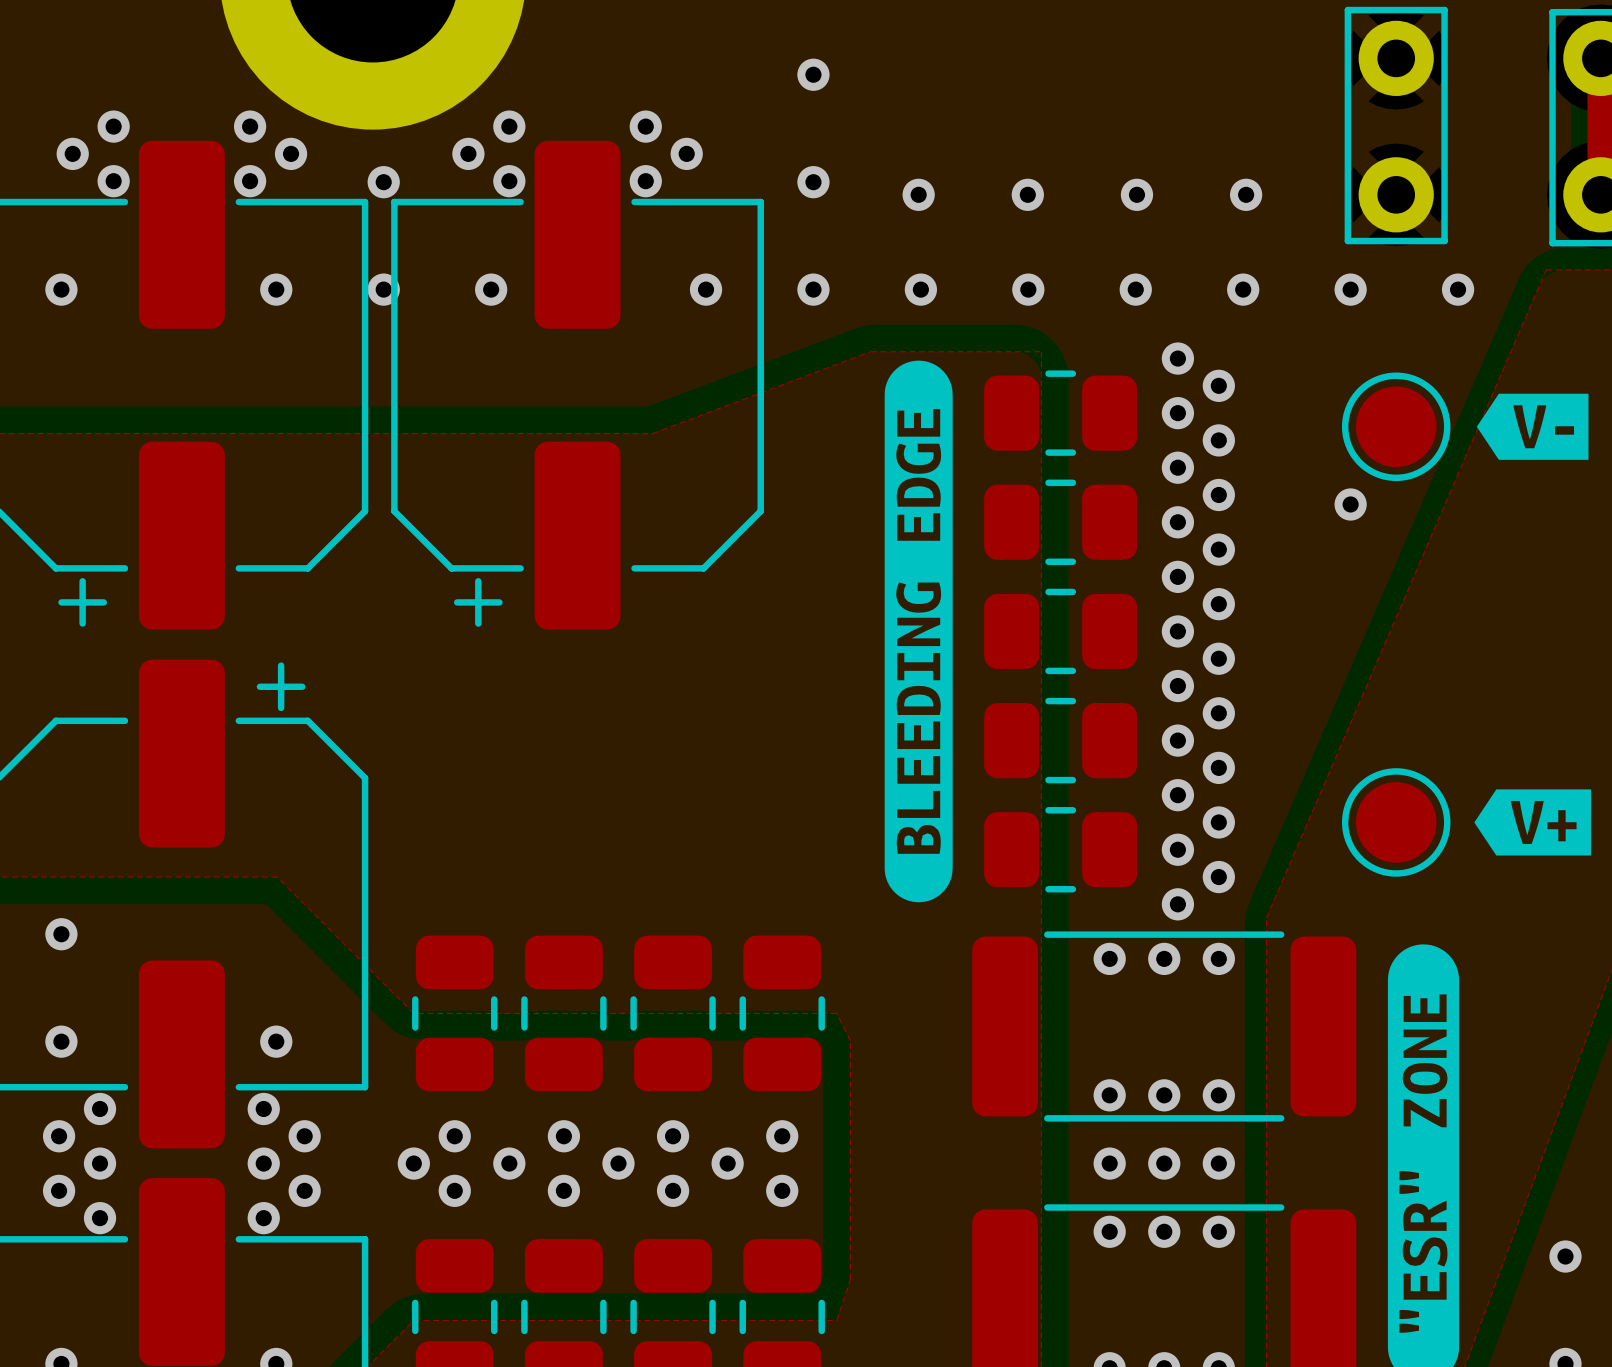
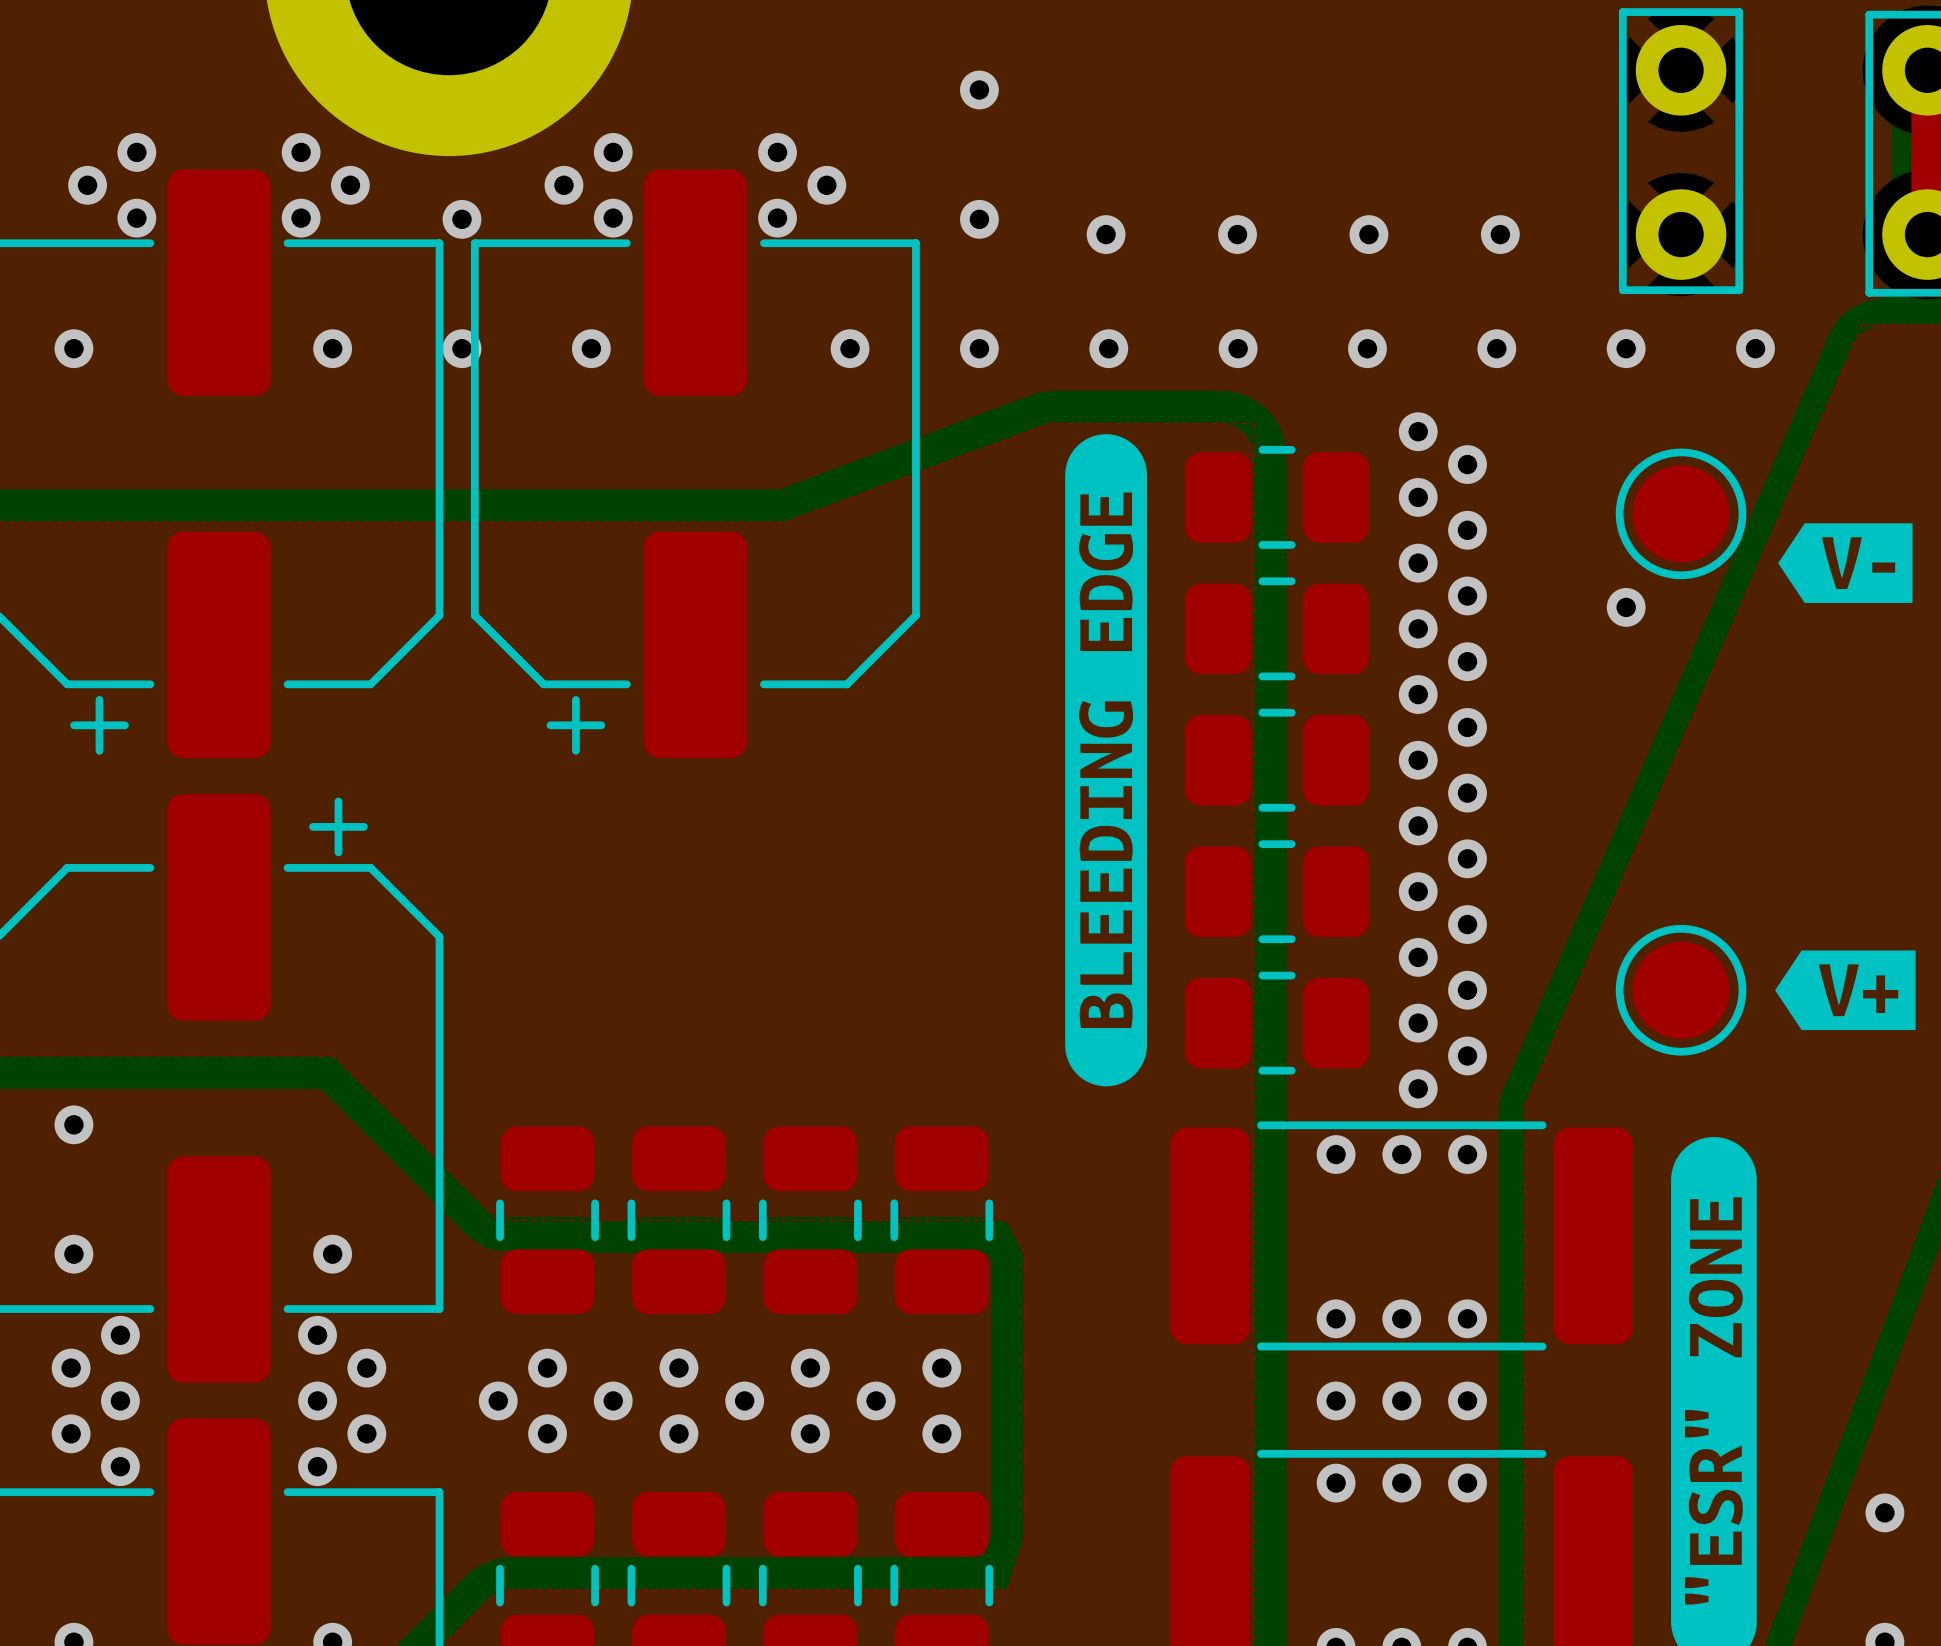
drawing position: (1532, 426) -> (1845, 563)

